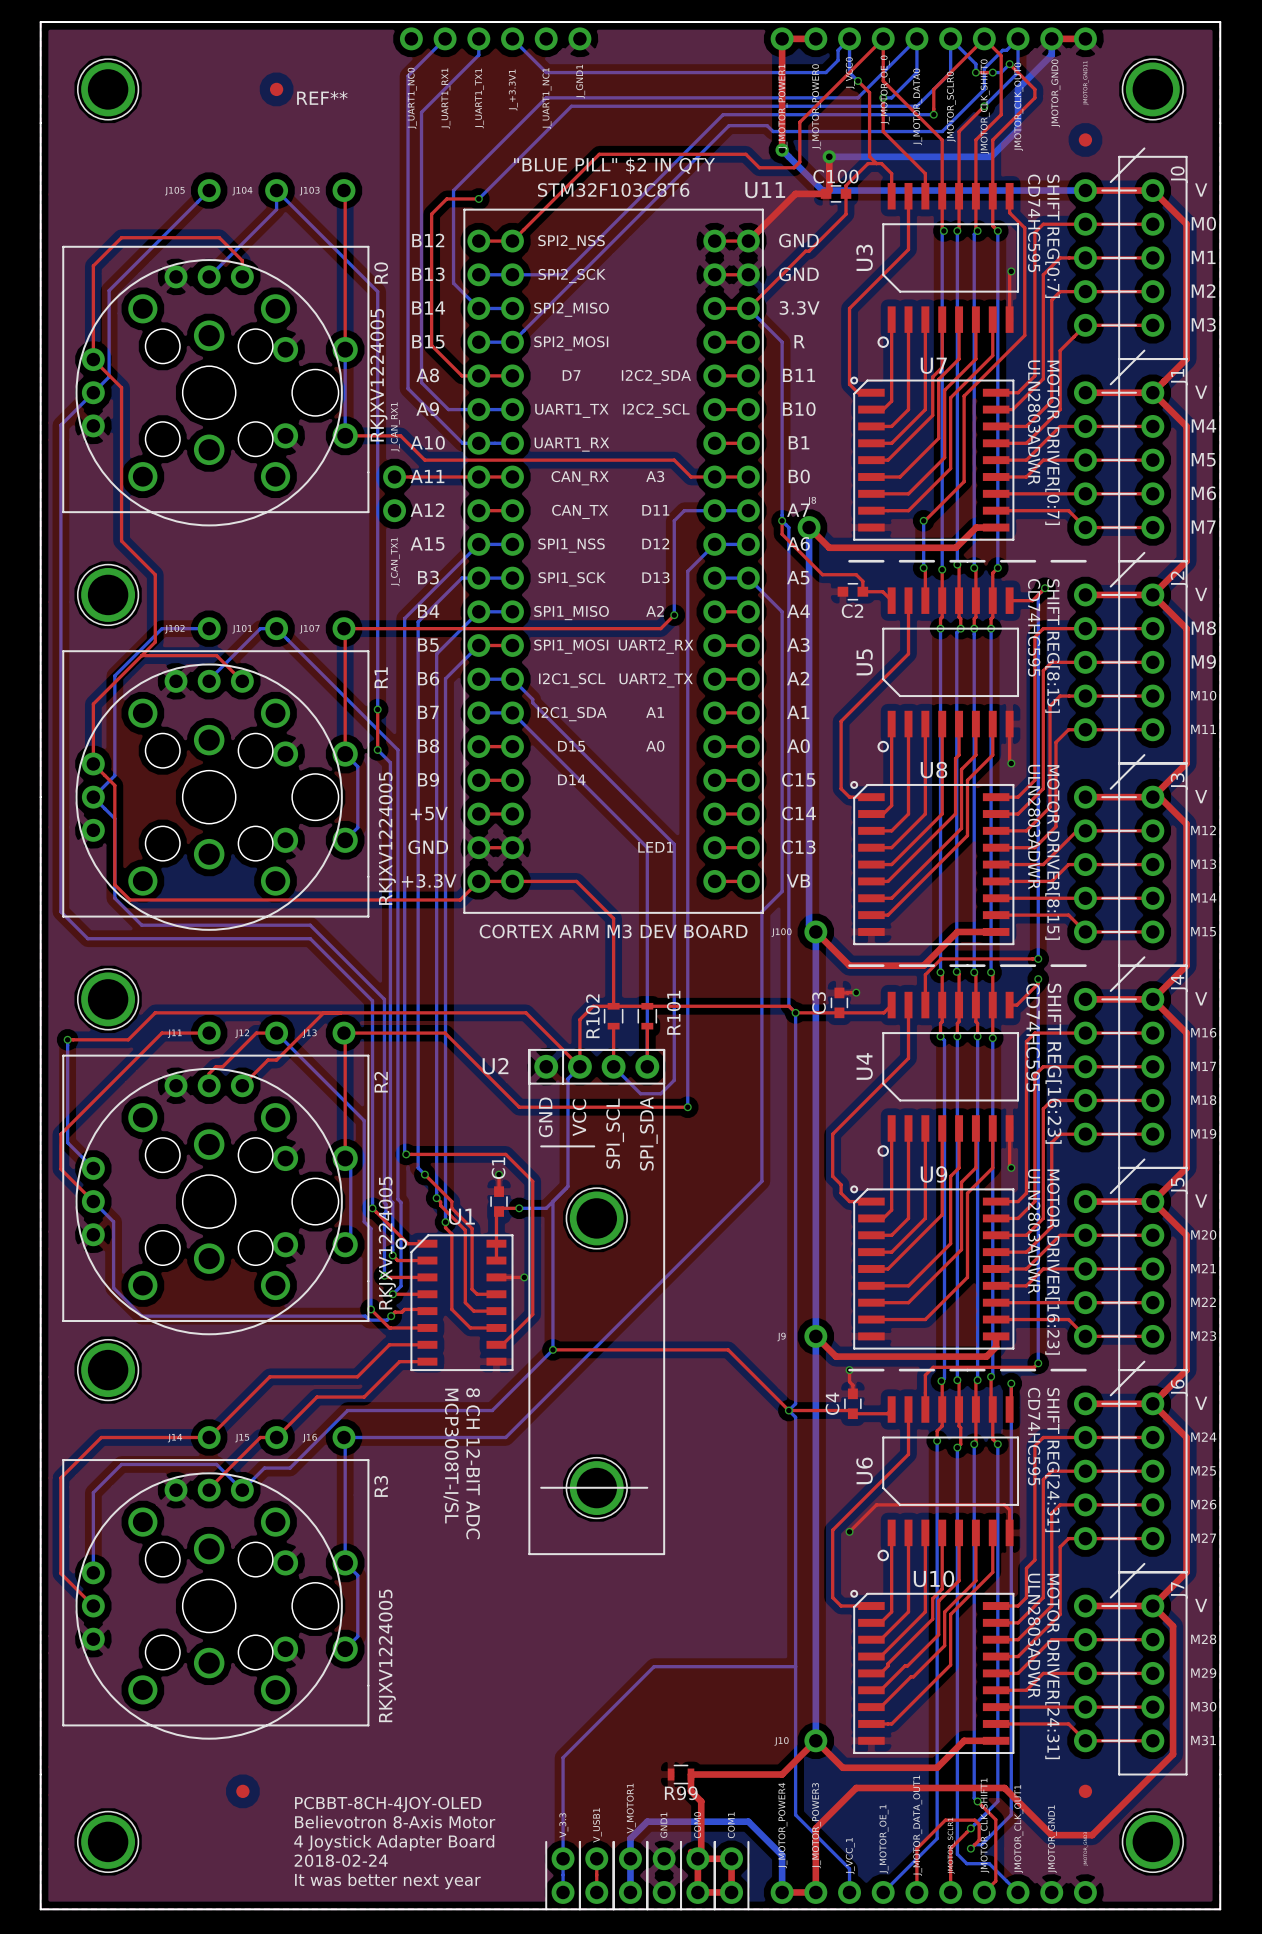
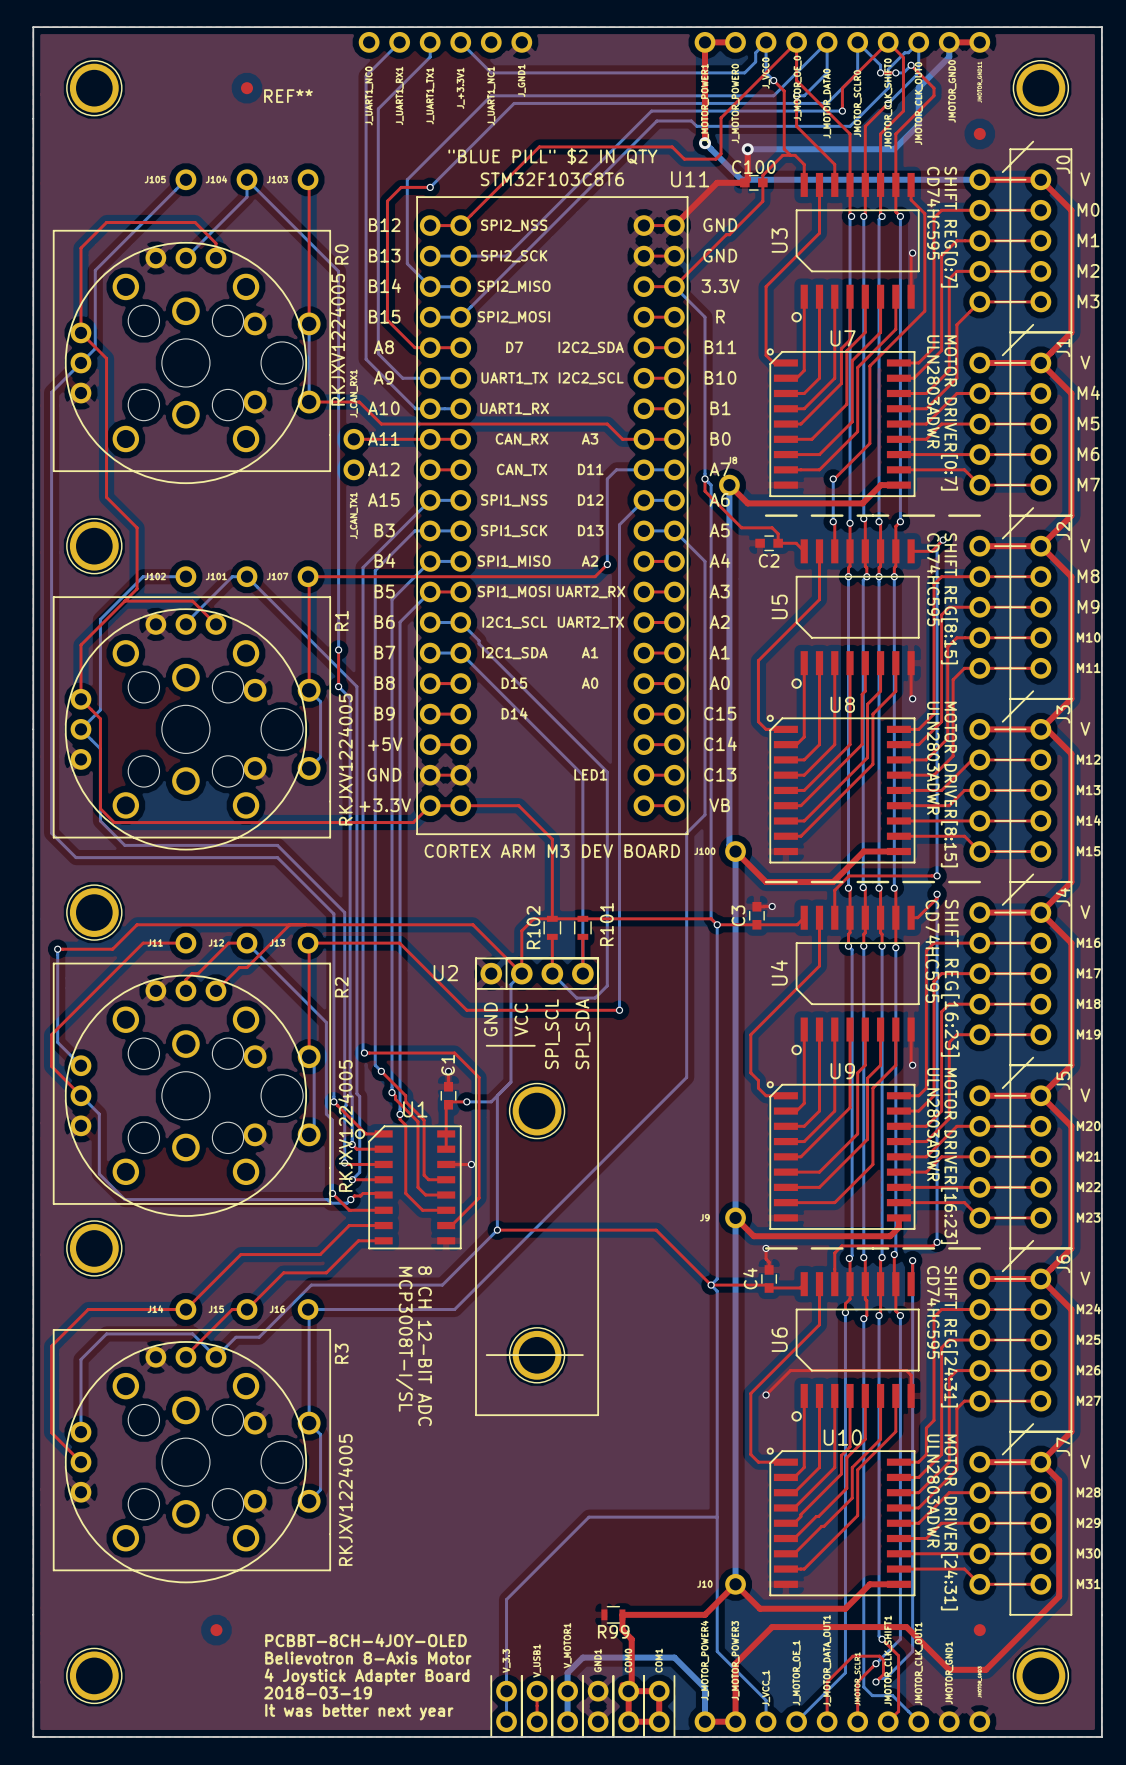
text: 2018-02-24 (341, 1860) -> 2018-03-19 (318, 1692)

